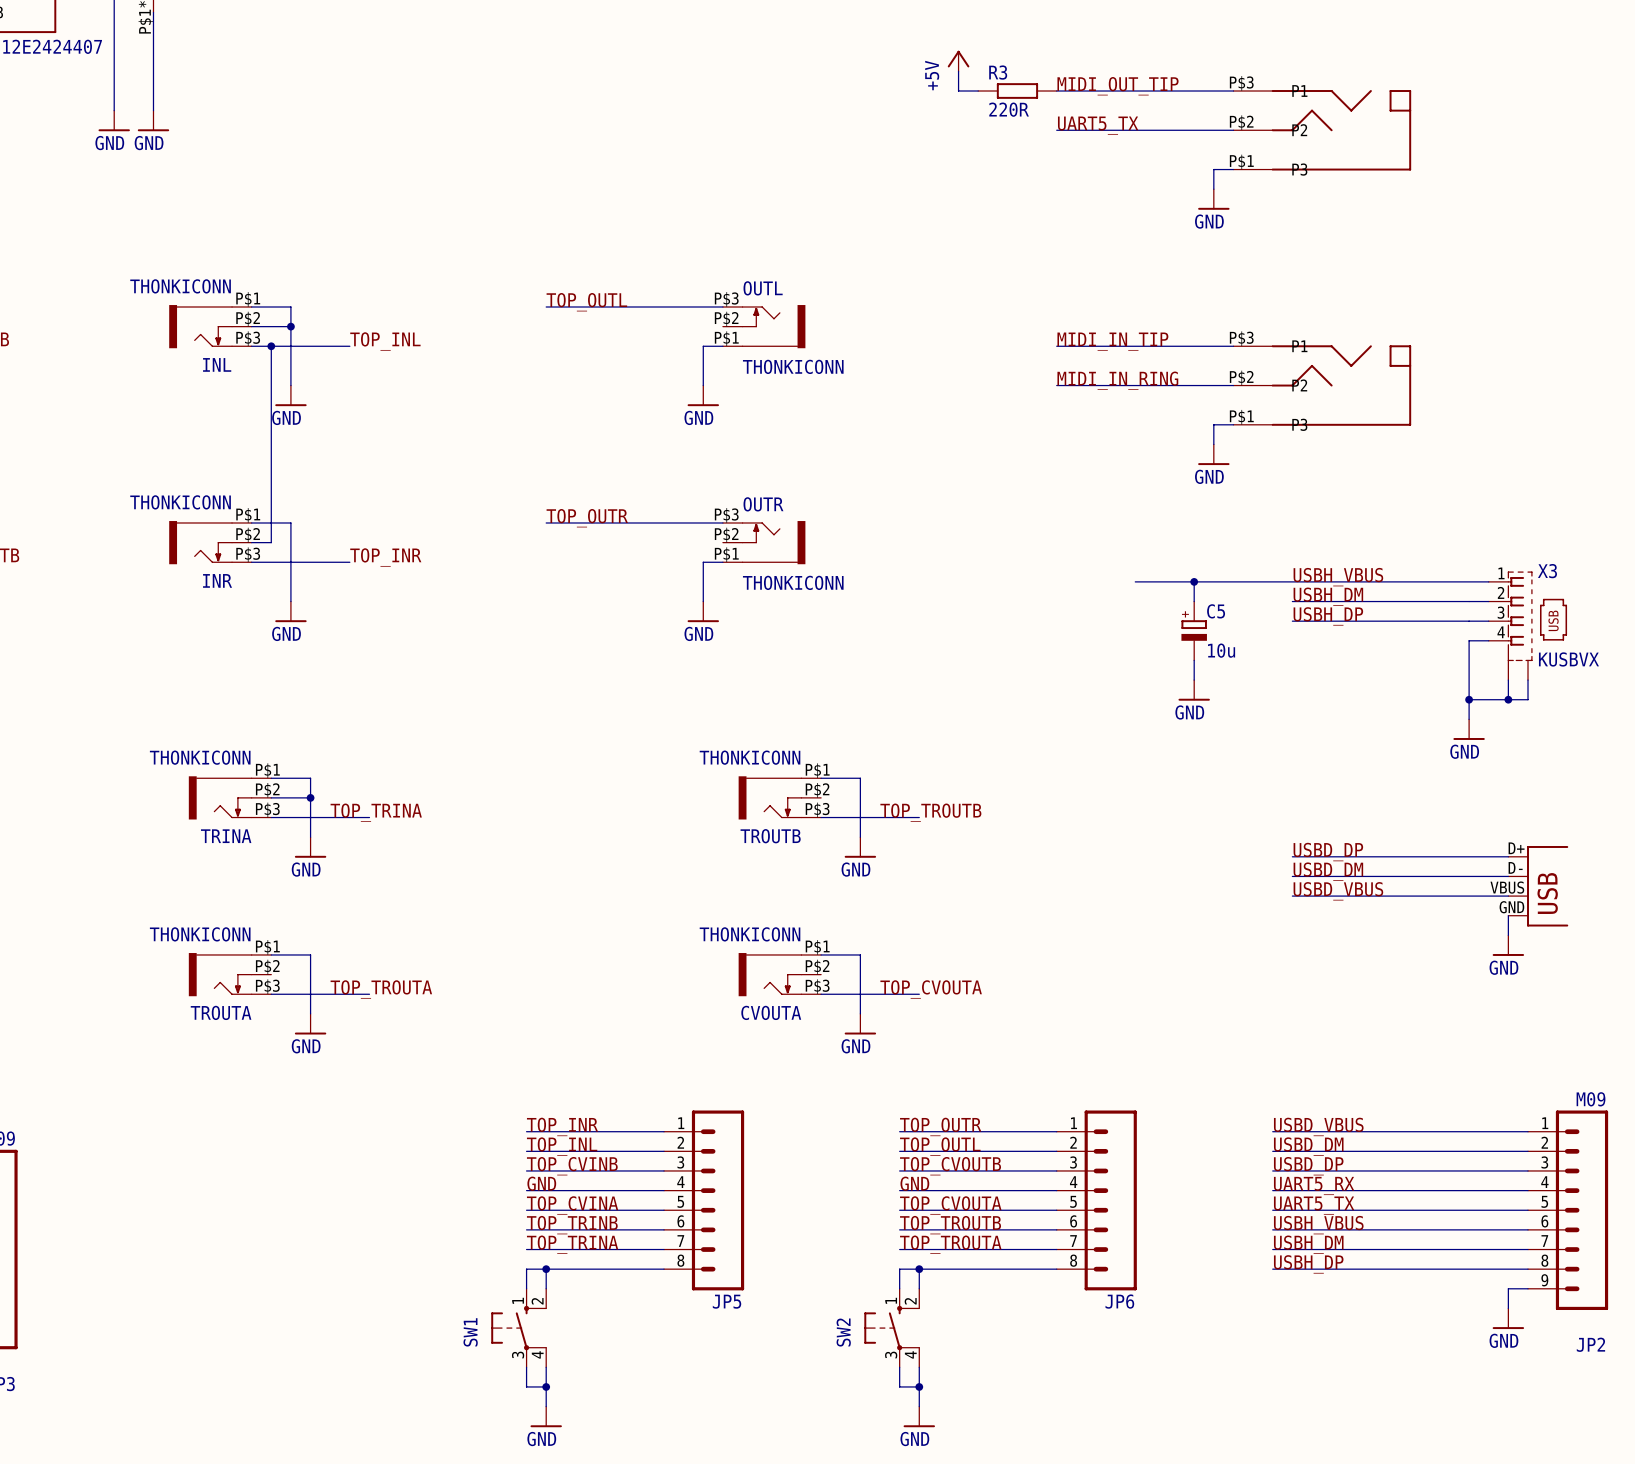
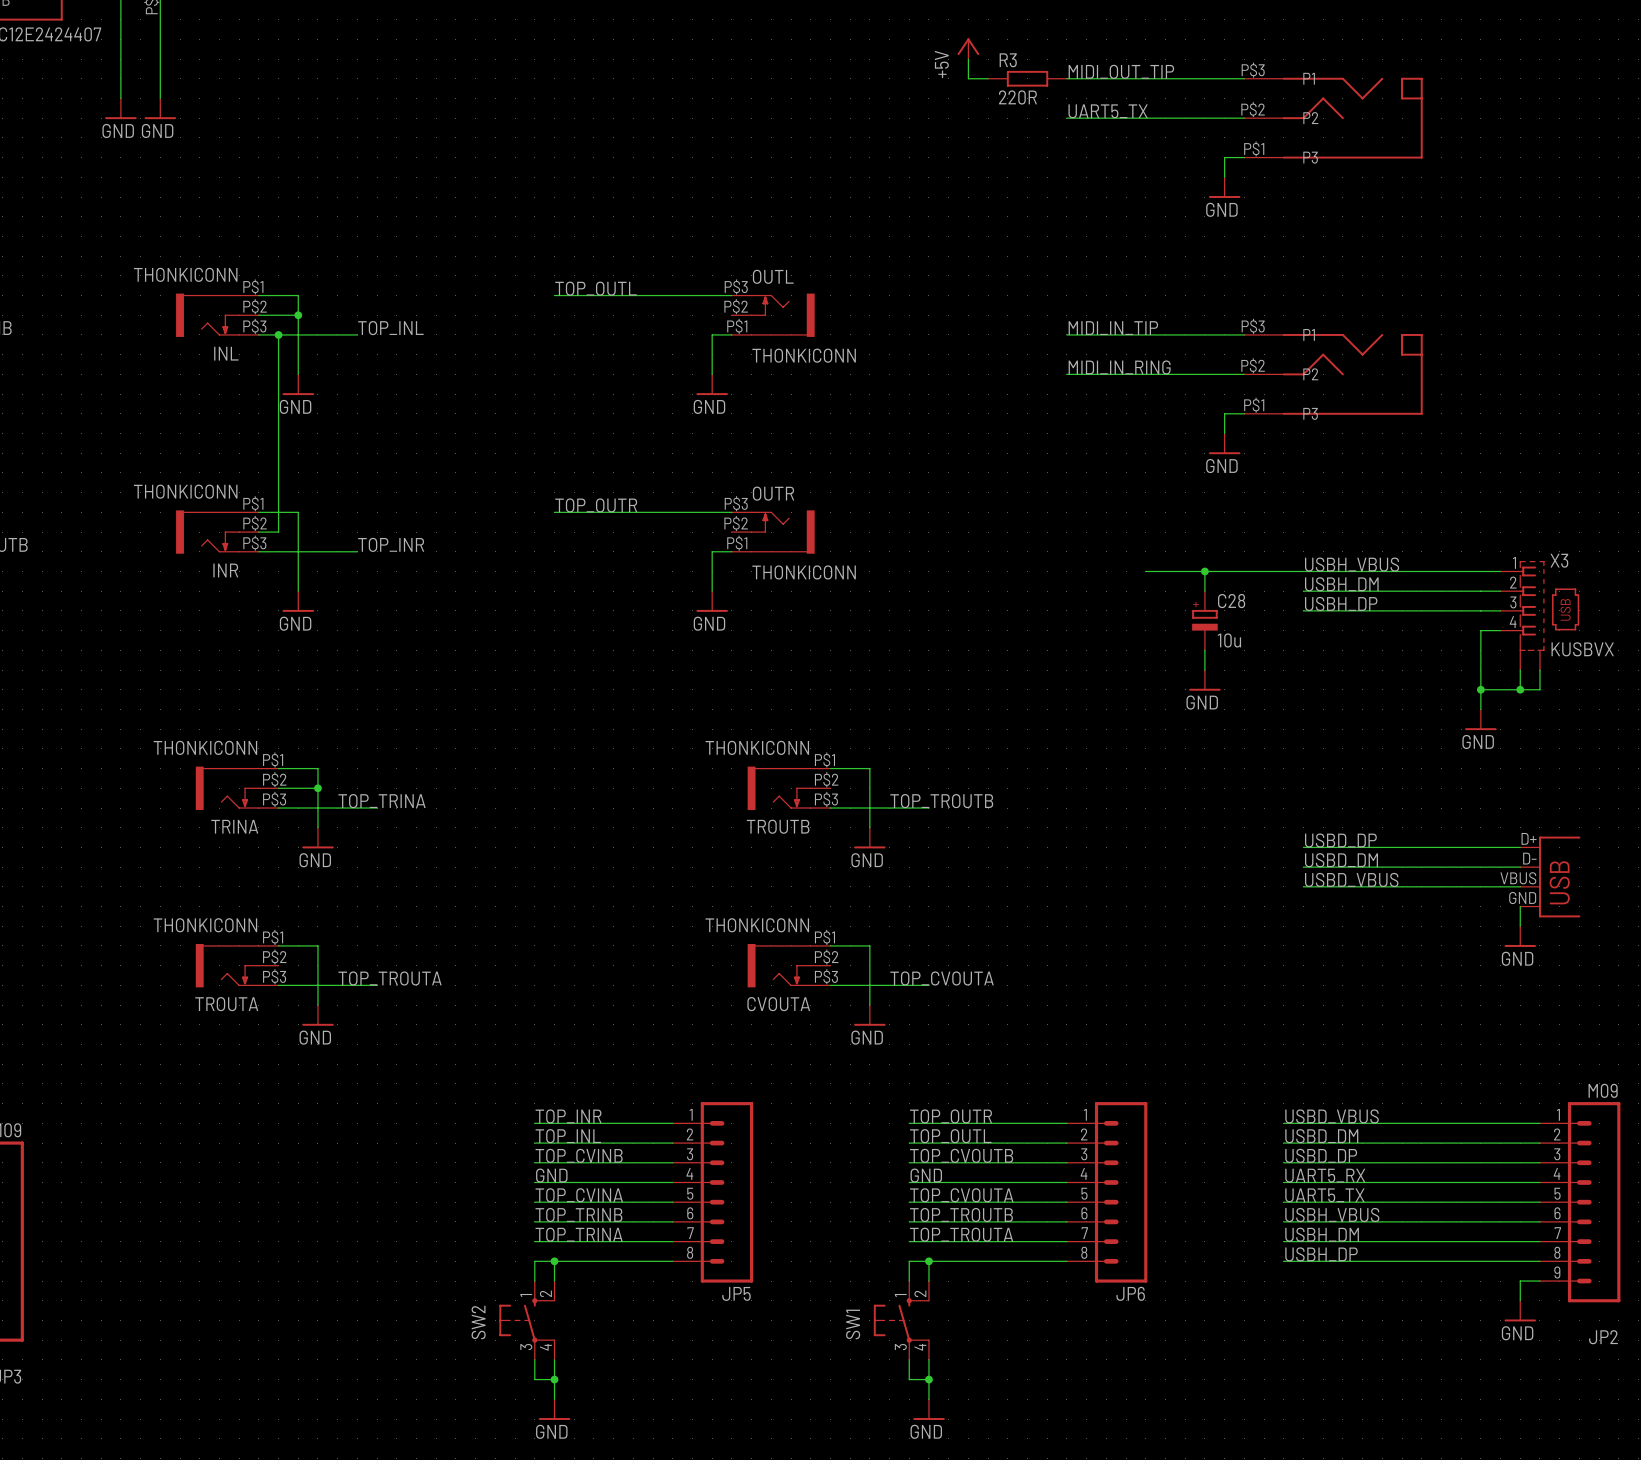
C5 name: C5 (1216, 611) -> C28 (1231, 601)
SW1 name: SW1 (470, 1332) -> SW2 (478, 1322)
SW2 name: SW2 (843, 1332) -> SW1 (853, 1324)

